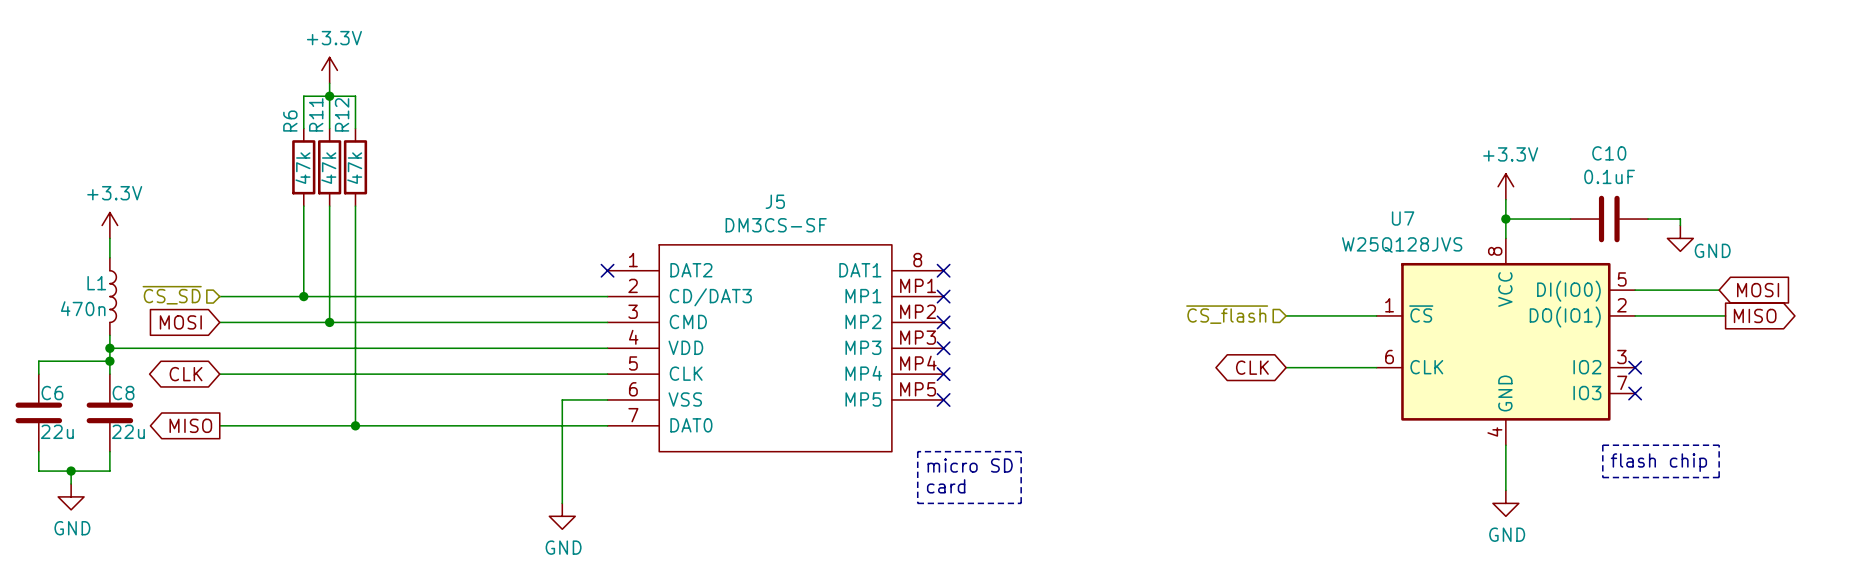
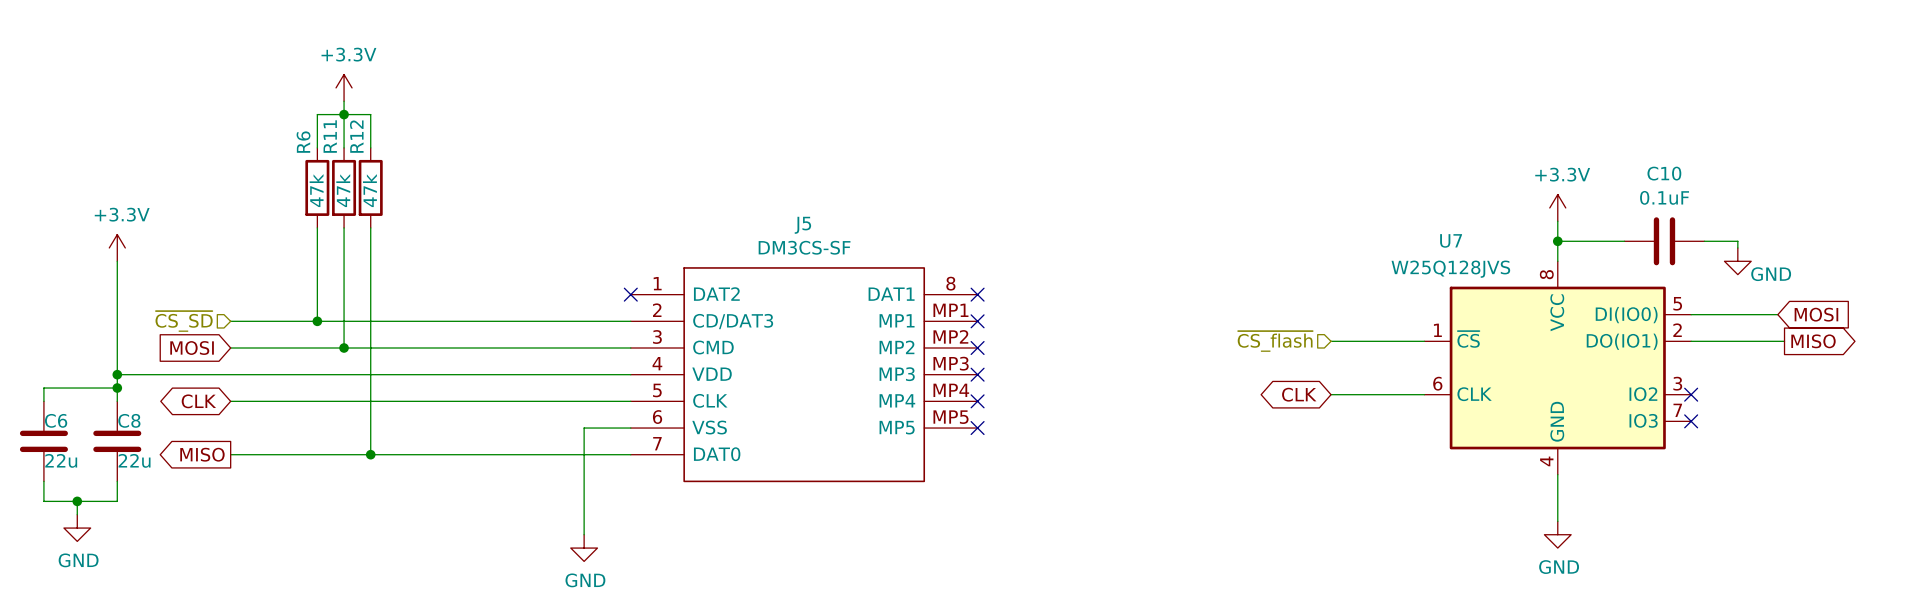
wire: none -> (117, 281) (117, 361)
L1: 470n (113, 296) -> none
line: (1602, 445) (1602, 477) (1719, 477) (1719, 445) (1602, 445) -> none
line: (917, 451) (1021, 451) (1021, 503) (917, 503) (917, 451) -> none
text: flash chip (1658, 462) -> none
text: micro SD (970, 465) -> none
text: card (946, 486) -> none

